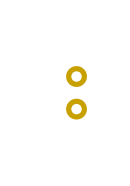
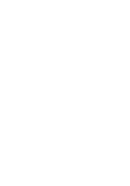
part: (76, 92) -> none

